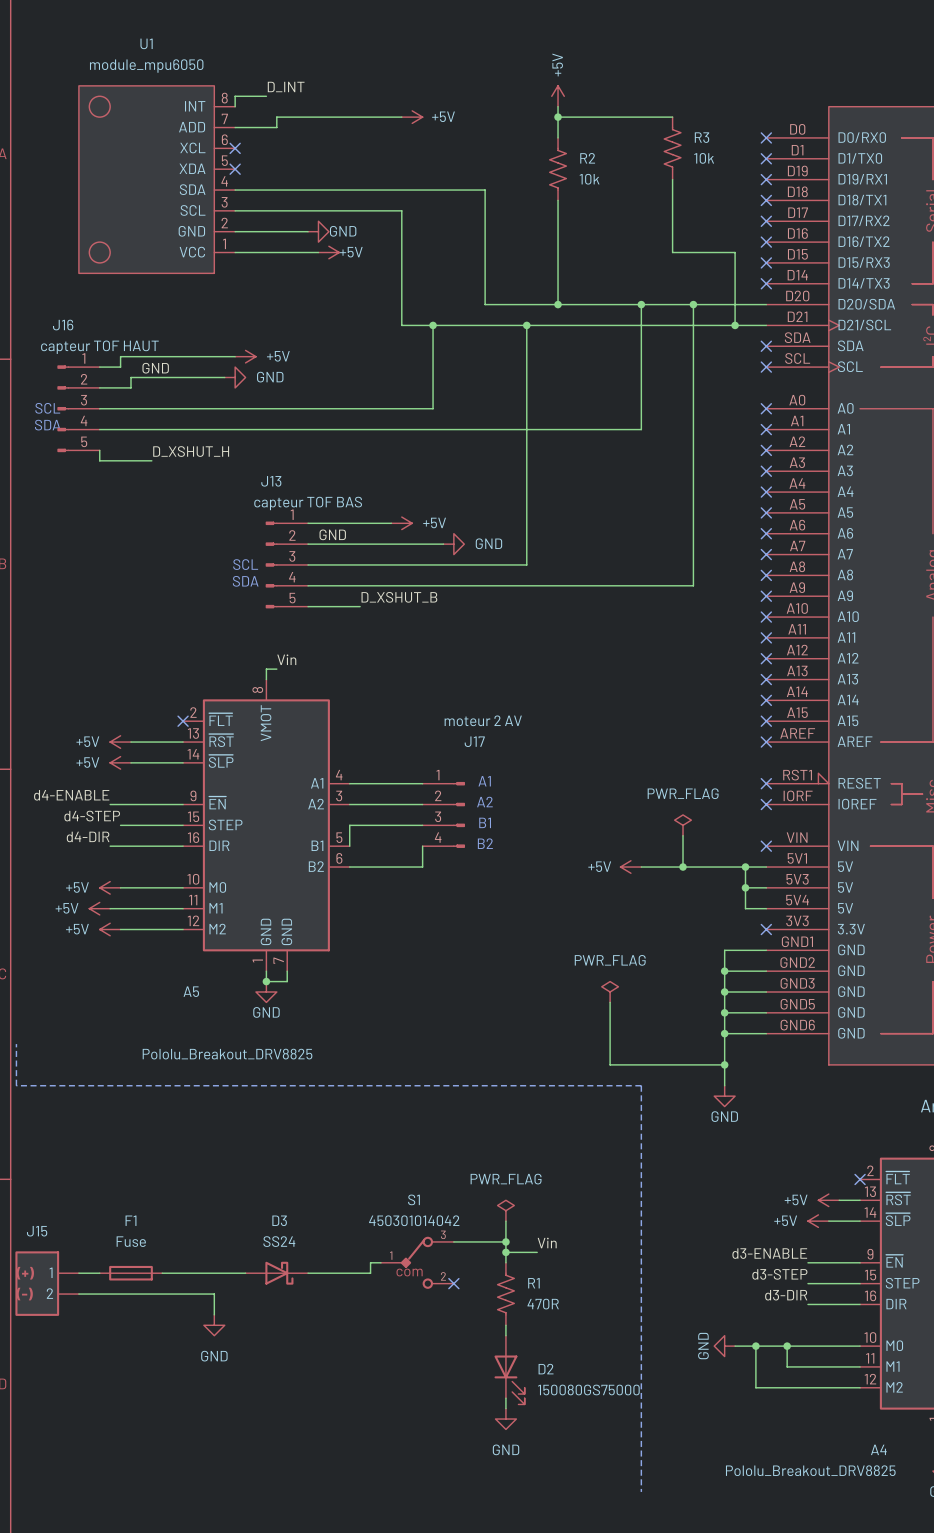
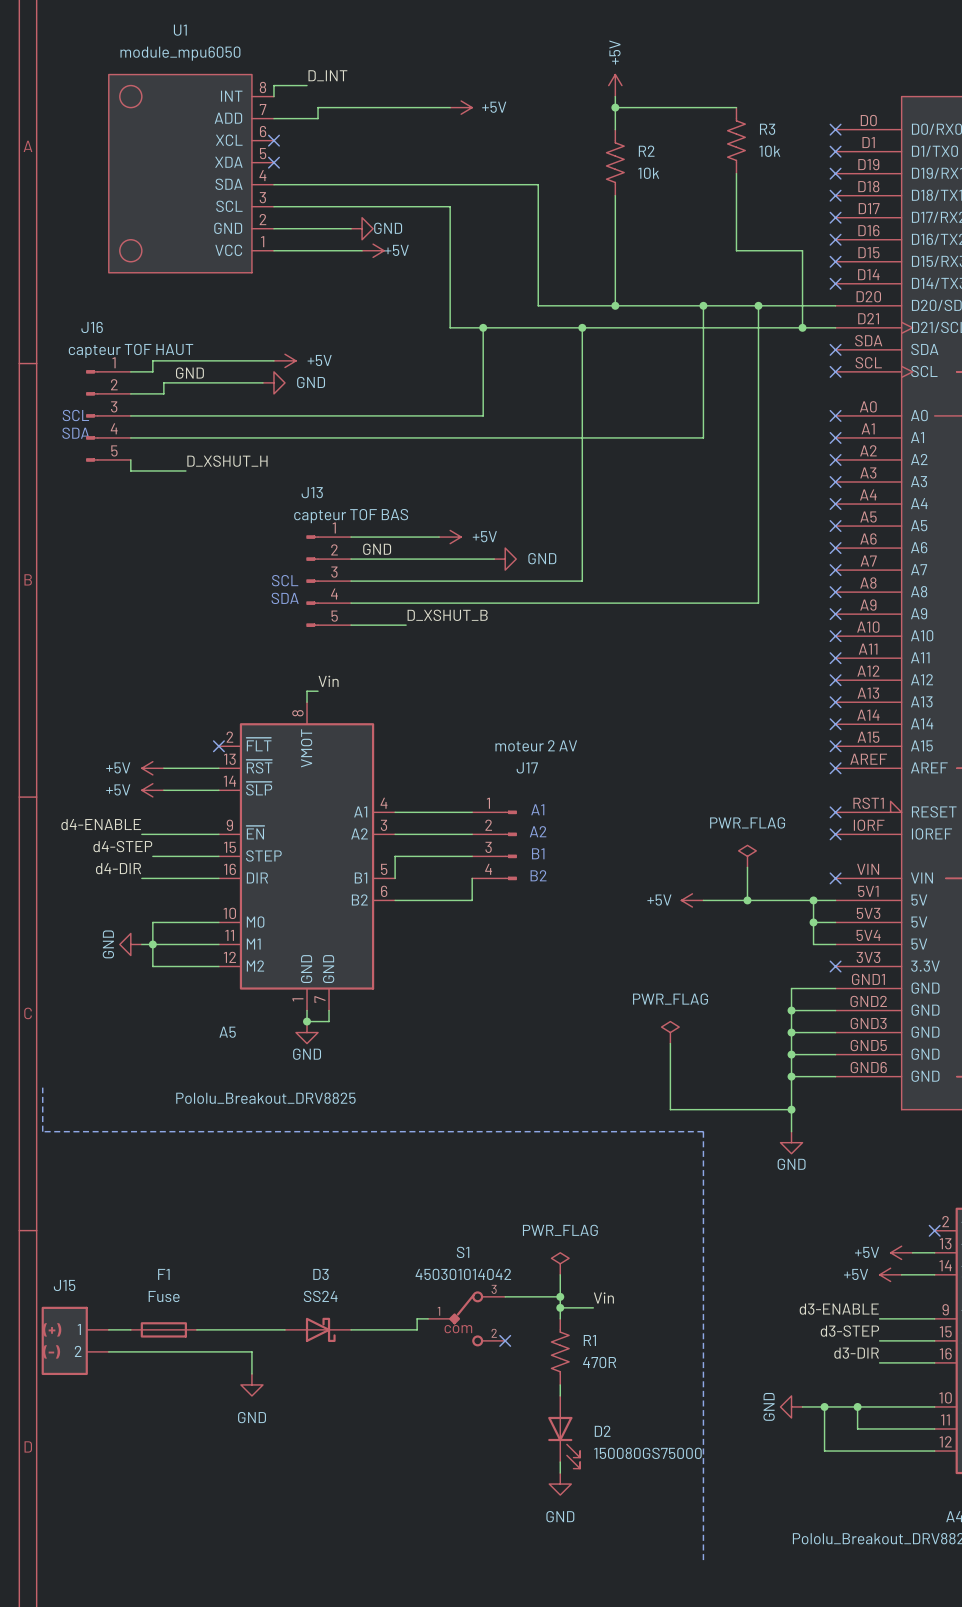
power symbol: +5V (110, 887) -> none
wire: none -> (152, 922) (152, 966)
power symbol: +5V (99, 908) -> GND (130, 944)
junction: none -> (152, 944)
power symbol: +5V (110, 929) -> none

